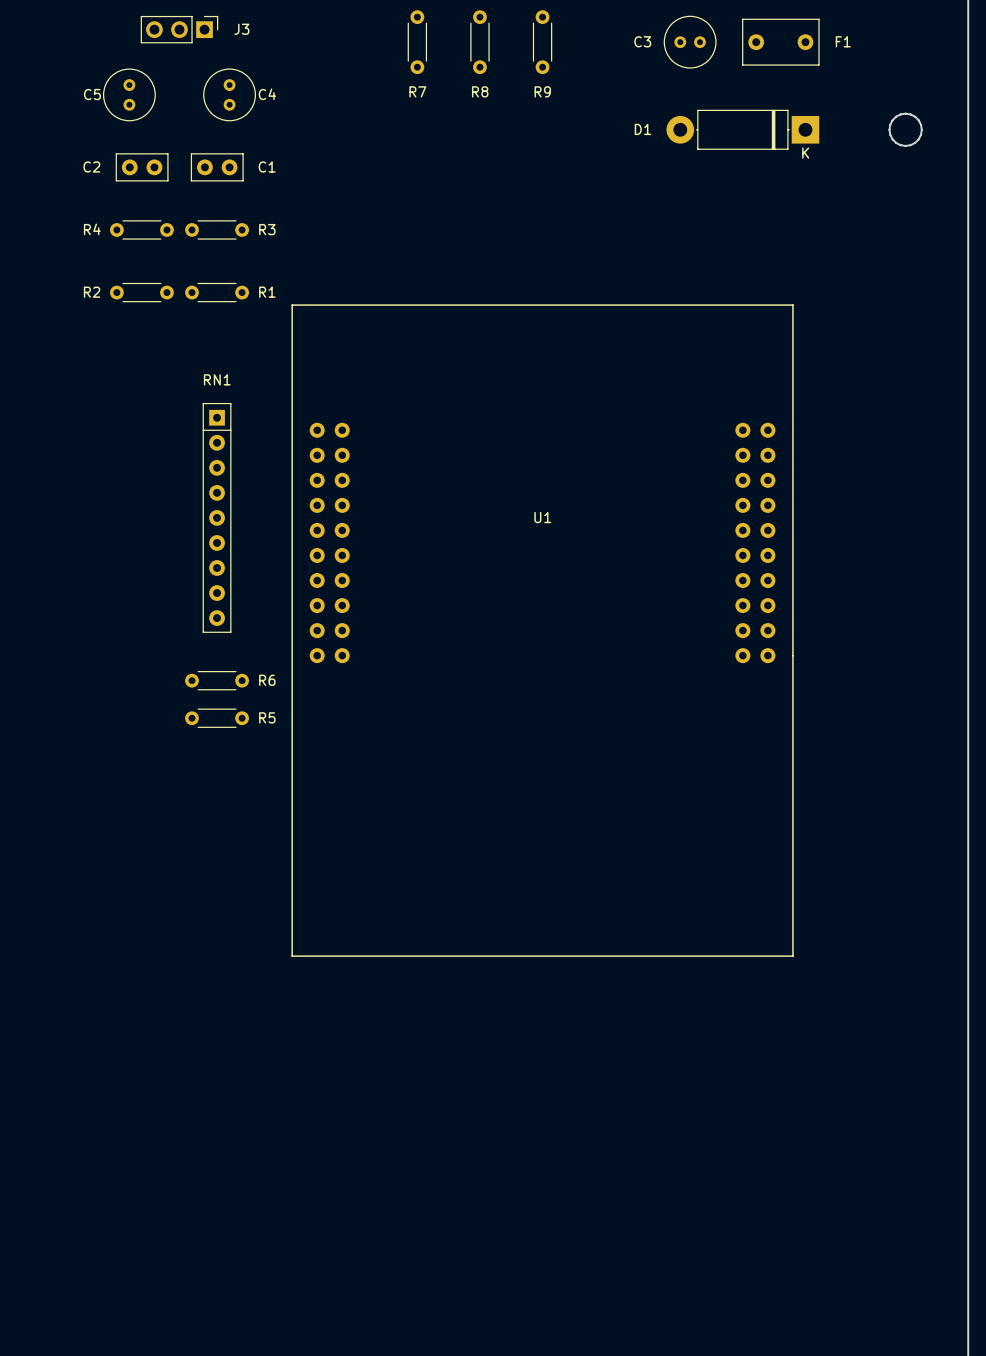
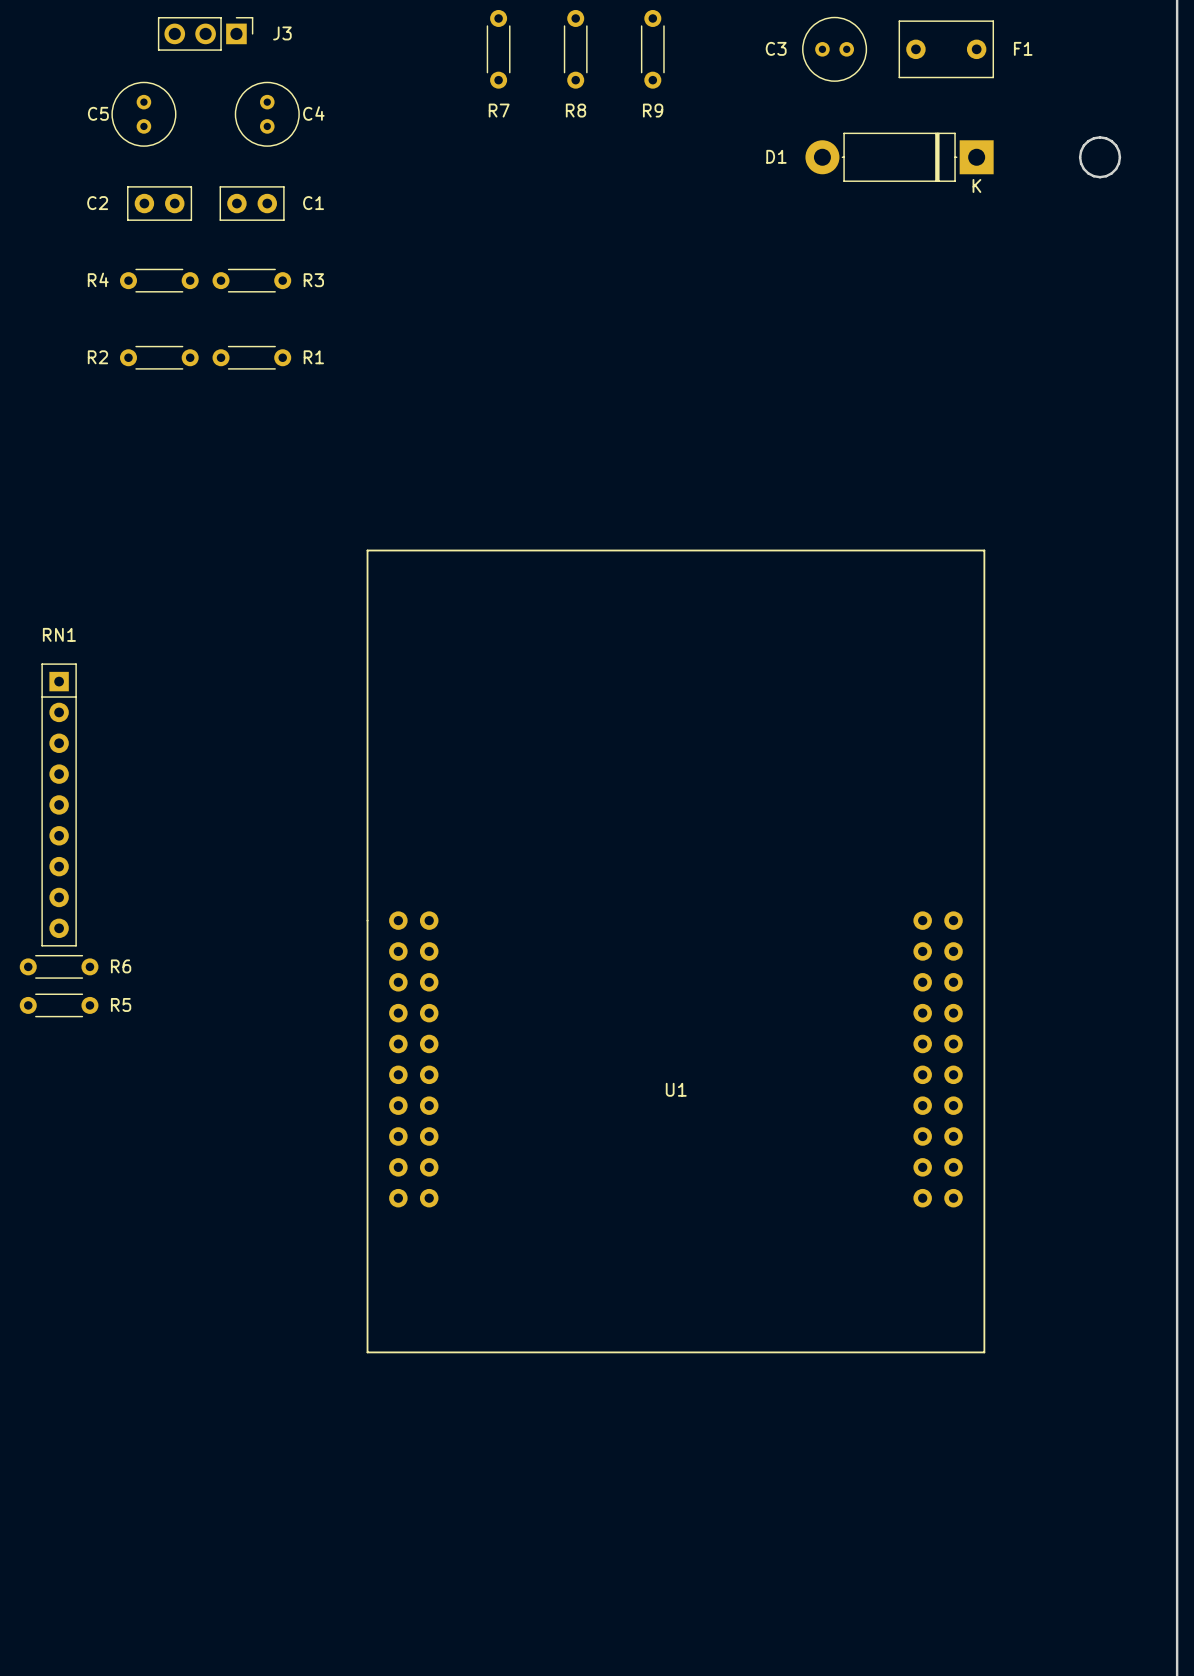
RN1 position: (217, 517) -> (59, 804)
U1 rotation: 0° (542, 630) -> 180° (675, 951)
R6 position: (217, 680) -> (59, 966)
R5 position: (217, 718) -> (59, 1005)

